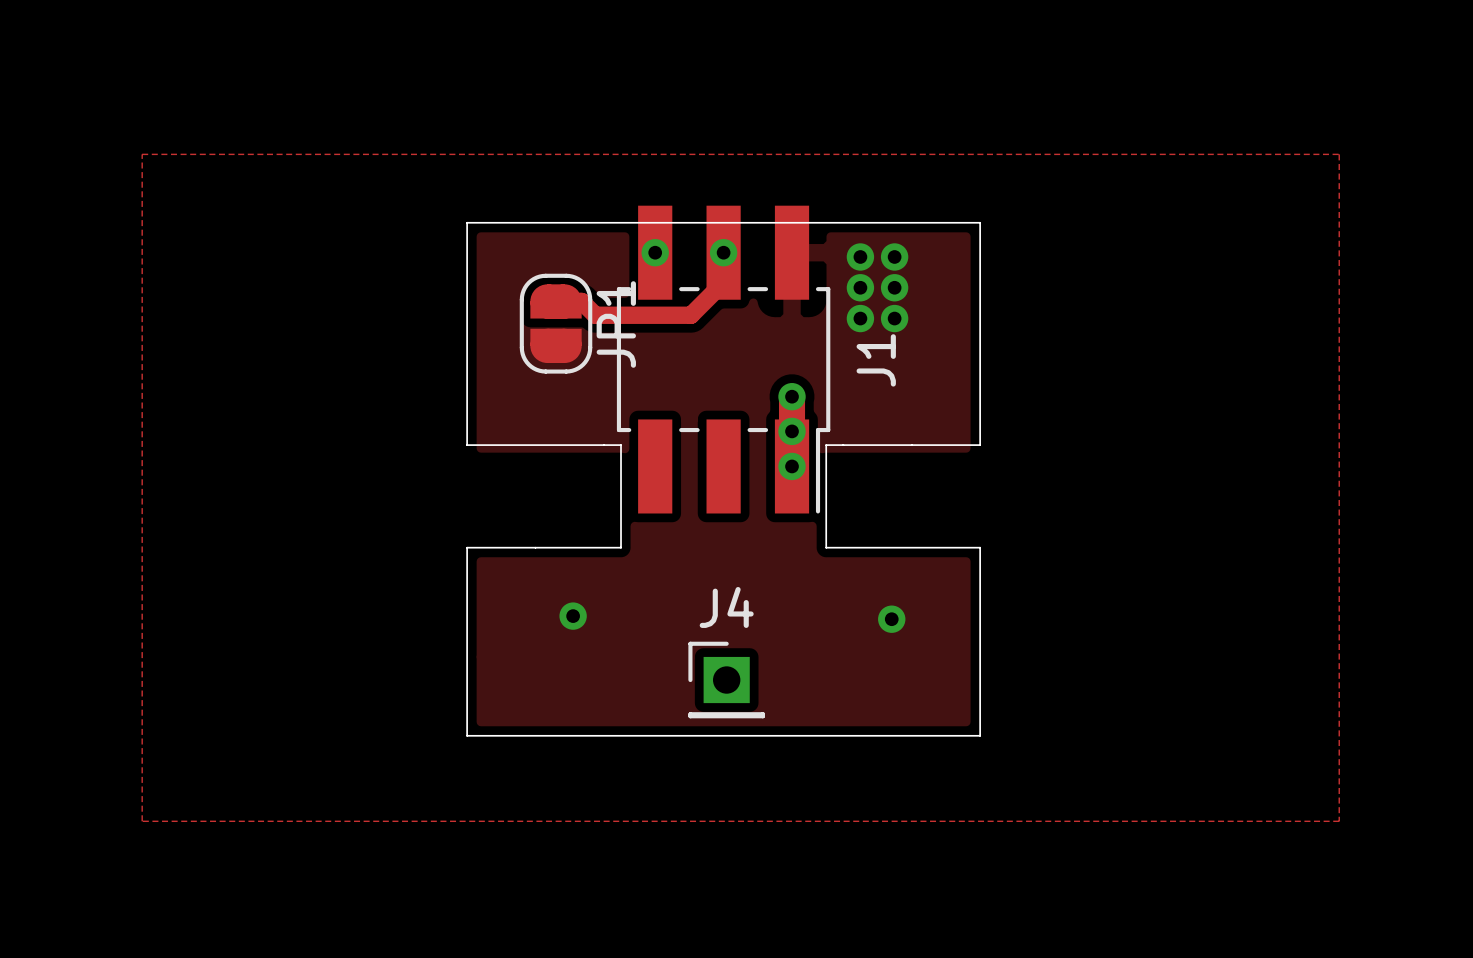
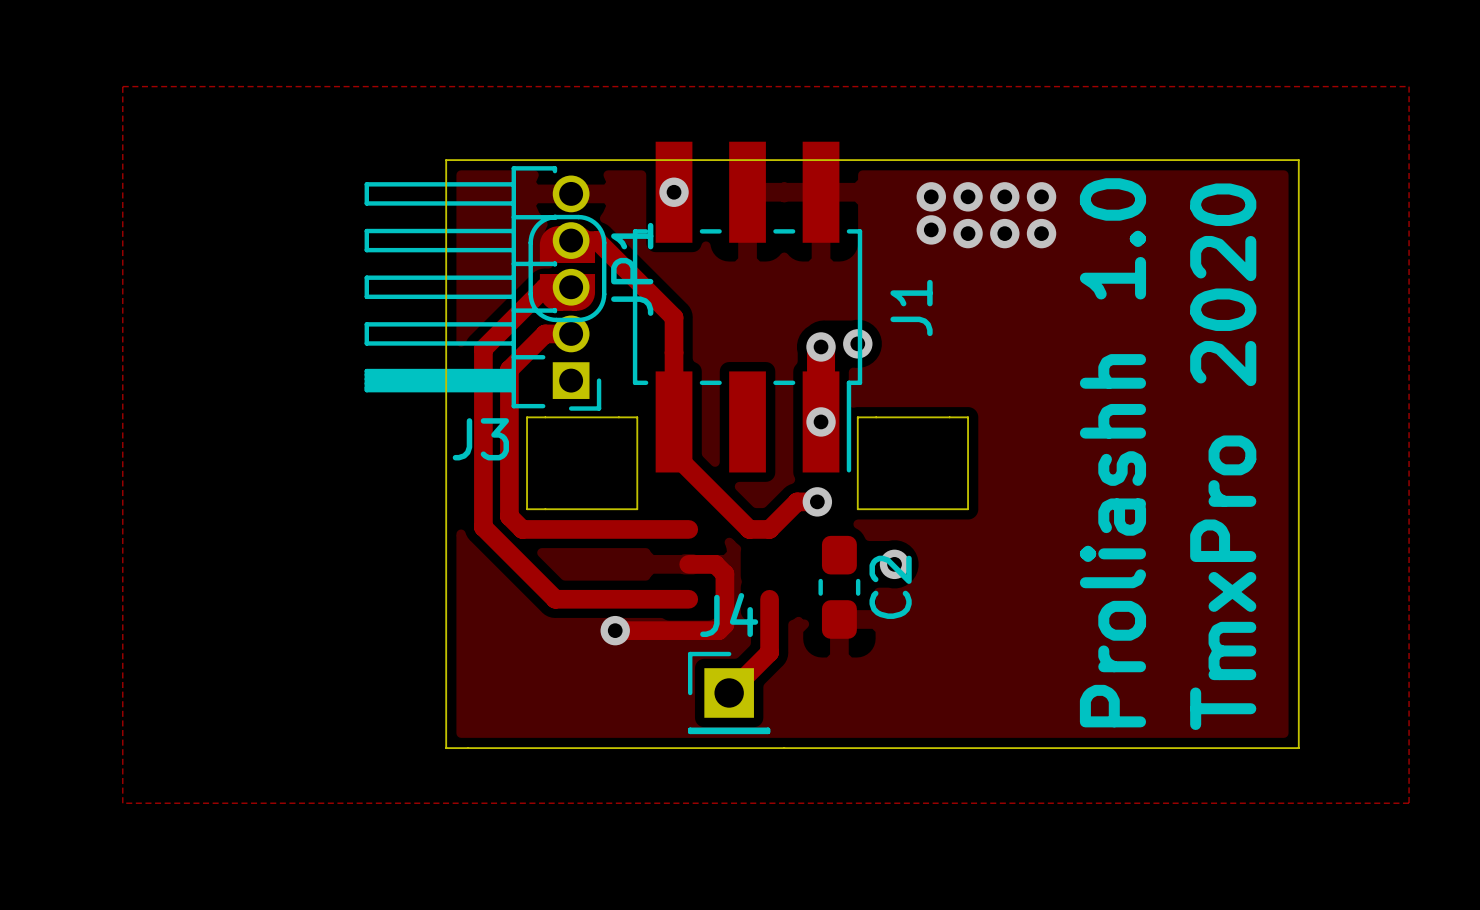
board edge: (467, 222) (467, 445) (621, 445) (621, 462) -> (471, 160) (446, 160) (446, 748) (1298, 748) (1298, 160) (1023, 160)
board edge: (980, 222) (980, 445) (826, 445) (826, 462) -> (968, 509) (968, 417) (857, 417)
track: (723, 252) (723, 282) (690, 315) (595, 315) (581, 301) (556, 301) -> none
via: (723, 252) -> none
via: (860, 256) -> none
via: none -> (968, 196)
via: none -> (1004, 196)
via: none -> (1041, 196)
via: (860, 287) -> none
via: none -> (968, 233)
via: none -> (1004, 233)
via: none -> (1041, 233)
track: none -> (571, 240) (597, 240) (674, 317) (674, 454) (749, 529) (769, 529) (797, 501) (817, 501)
via: (860, 318) -> none
via: (894, 318) -> none
track: none -> (571, 287) (545, 287) (483, 348) (483, 527) (555, 599) (688, 599)
J3: none -> (482, 288)
track: none -> (571, 333) (545, 333) (509, 369) (509, 516) (522, 529) (688, 529)
via: none -> (857, 343)
via: (792, 431) -> none
text: none -> Proliashh 1.0 (1112, 452)
text: none -> TmxPro 2020 (1223, 456)
via: none -> (817, 501)
board edge: (518, 547) (467, 547) (467, 735) (980, 735) (980, 547) (928, 547) -> (527, 509) (527, 417) (637, 417)
track: none -> (688, 564) (715, 564) (724, 573) (724, 624) (718, 630) (615, 630)
via position: (573, 616) -> (615, 630)
via position: (891, 619) -> (894, 564)
C2: none -> (839, 587)
track: none -> (769, 599) (769, 652) (729, 692)
J4 position: (726, 680) -> (729, 692)

